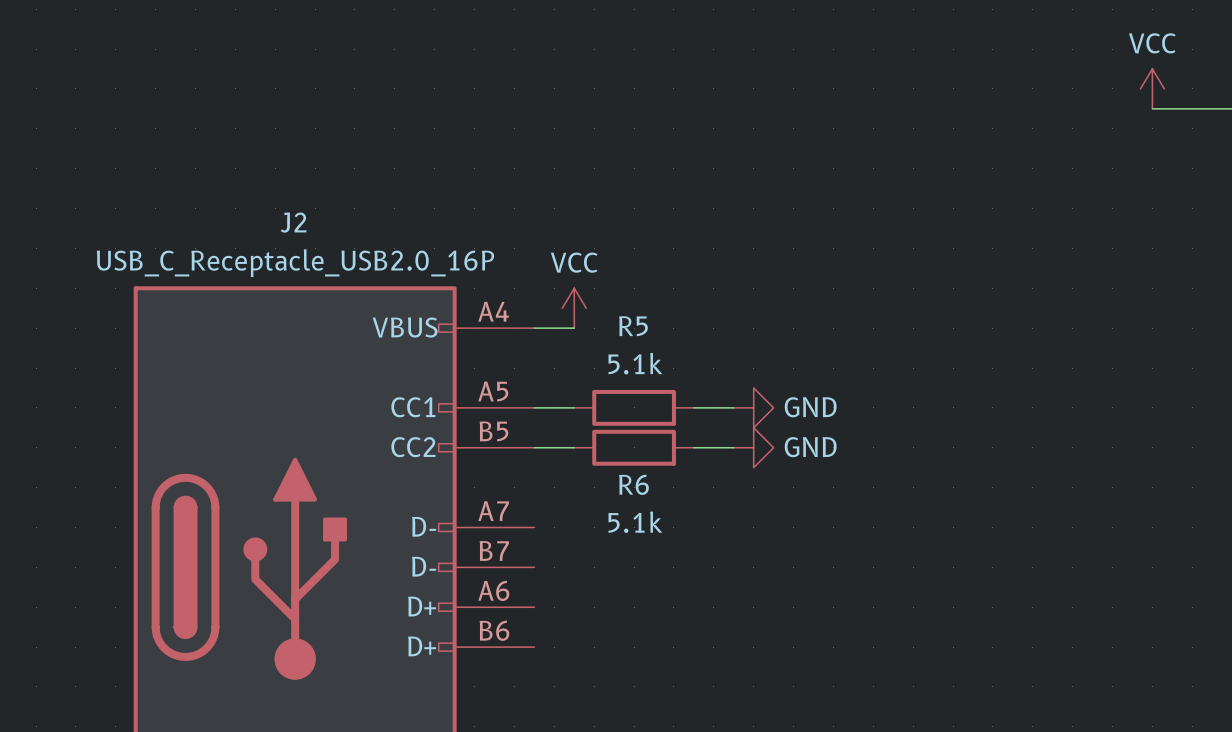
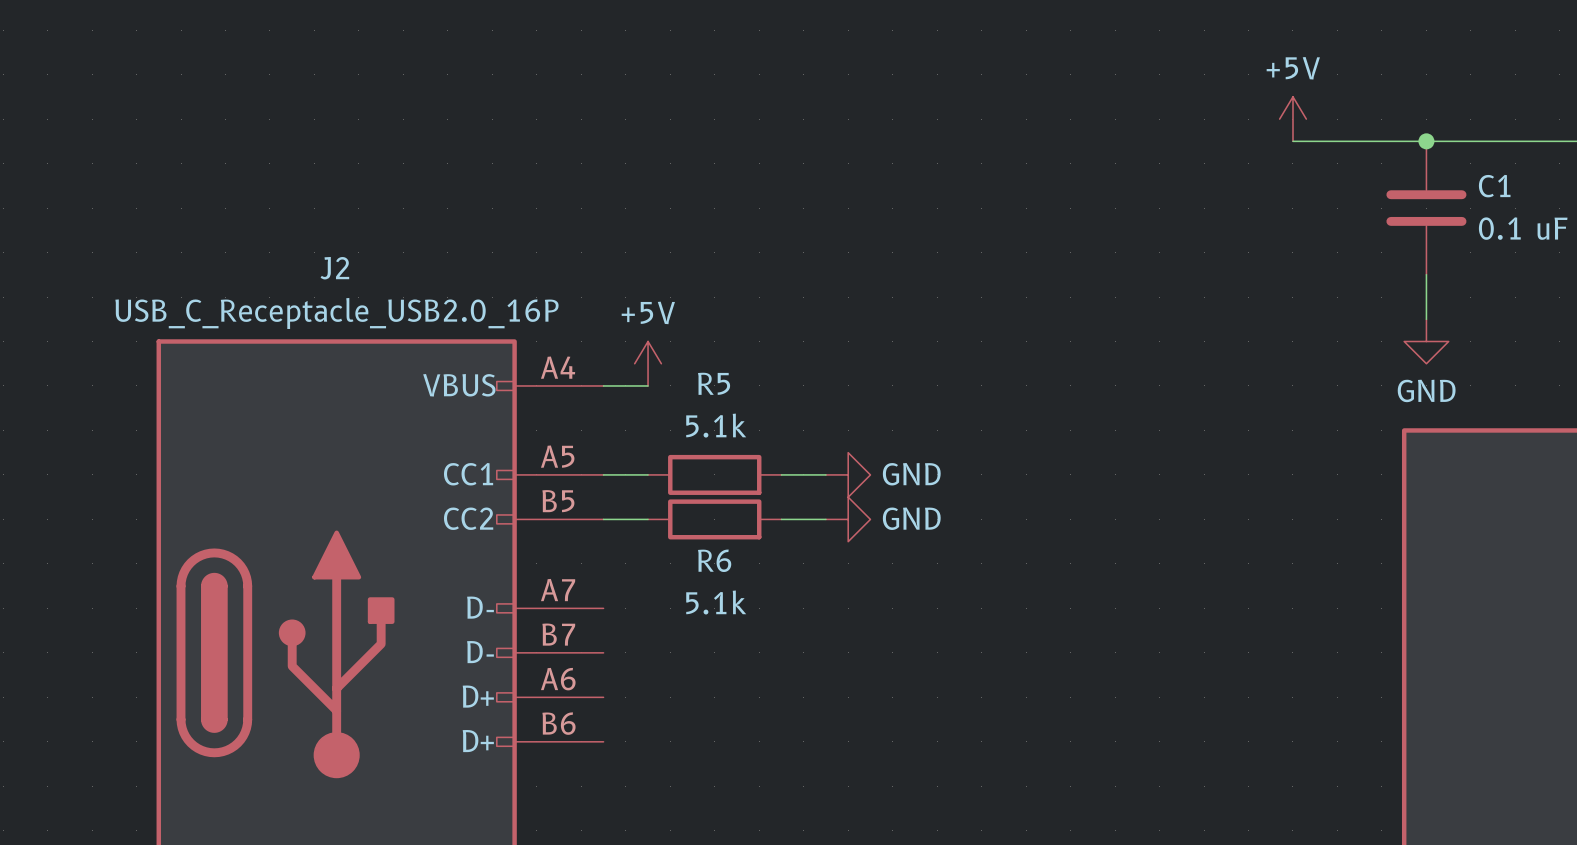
power symbol: VCC (1152, 88) -> +5V (1292, 119)
power symbol: VCC (574, 308) -> +5V (648, 363)

